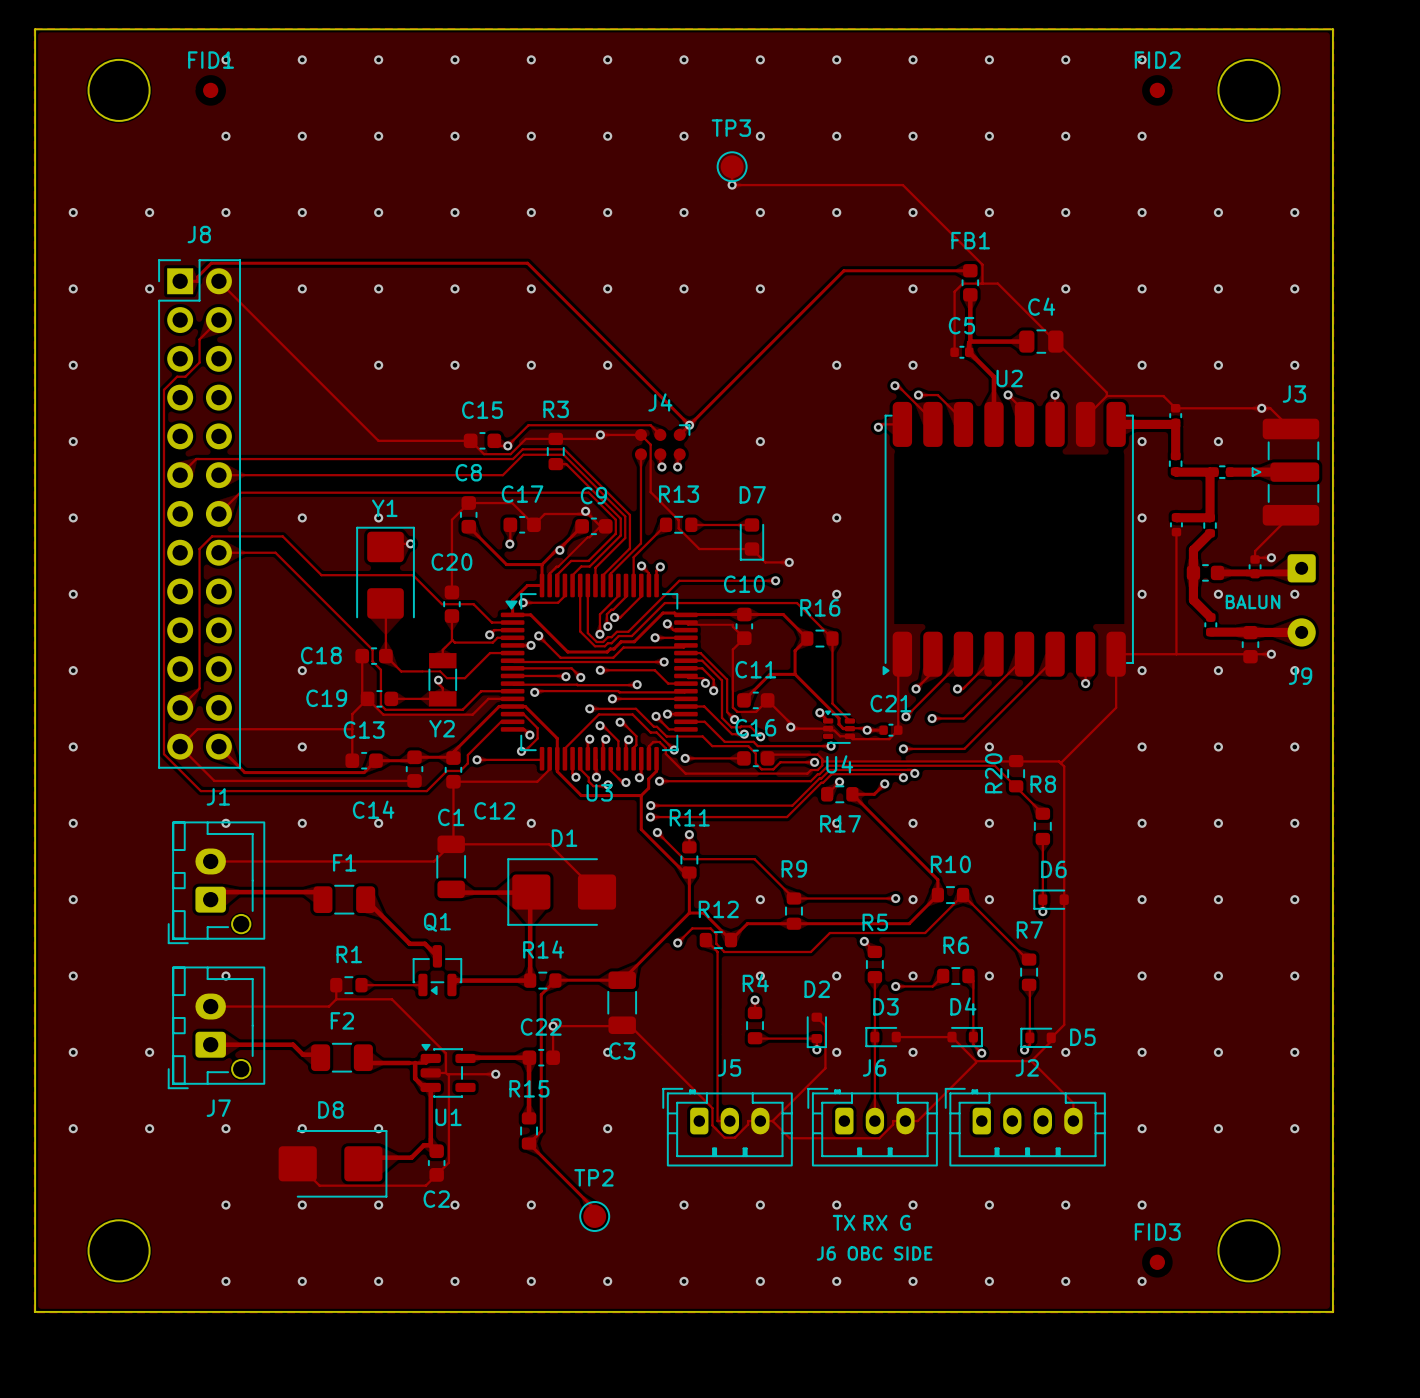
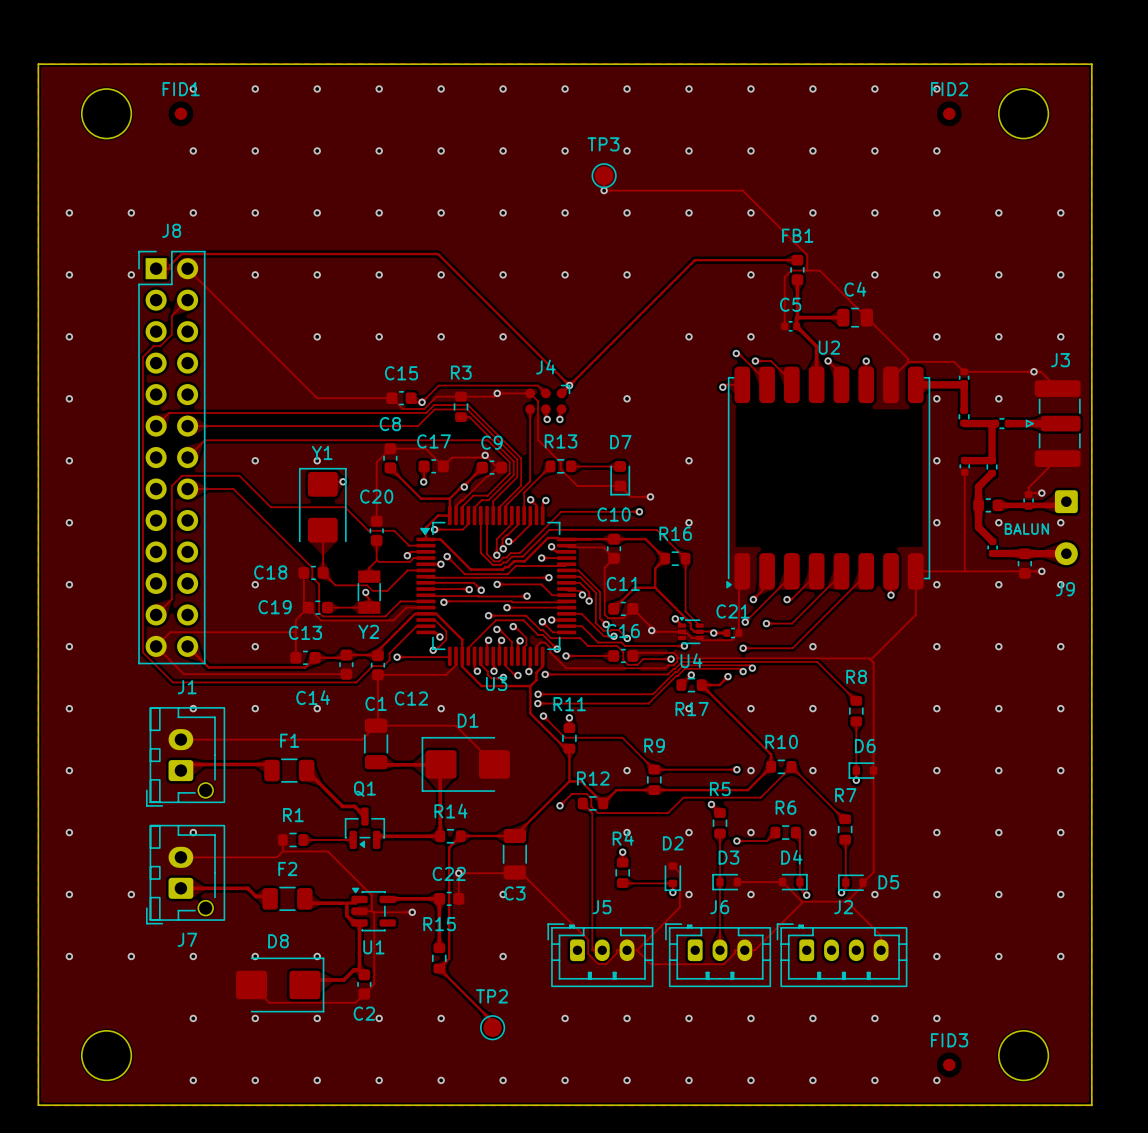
R20: (1016, 773) -> none
text: TX (844, 1222) -> none
text: RX (875, 1222) -> none
text: G (905, 1222) -> none
text: J6 OBC SIDE (874, 1253) -> none

